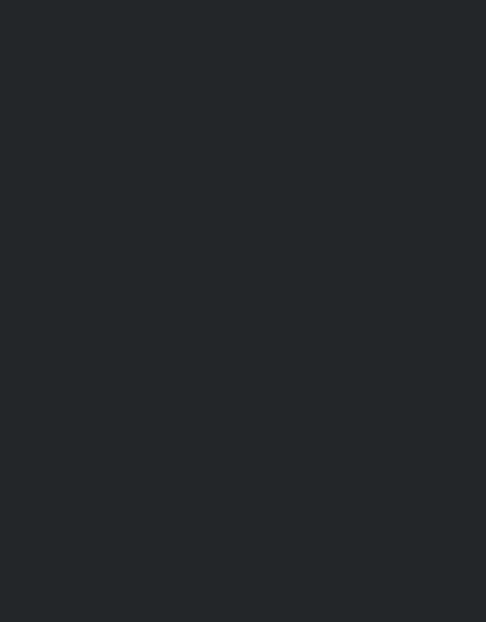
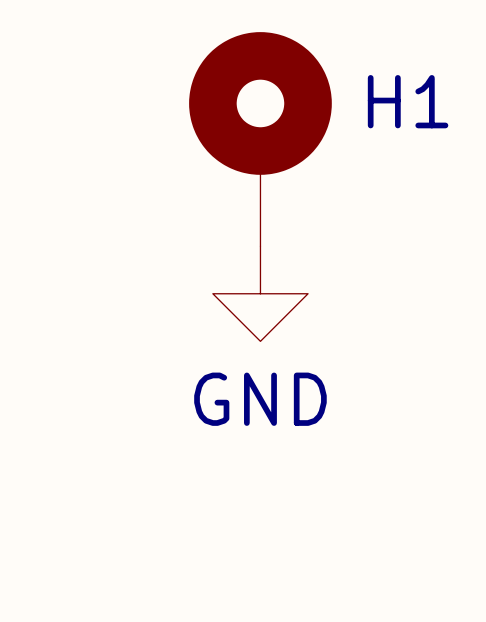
H1: none -> (260, 139)
power symbol: none -> GND (260, 293)

